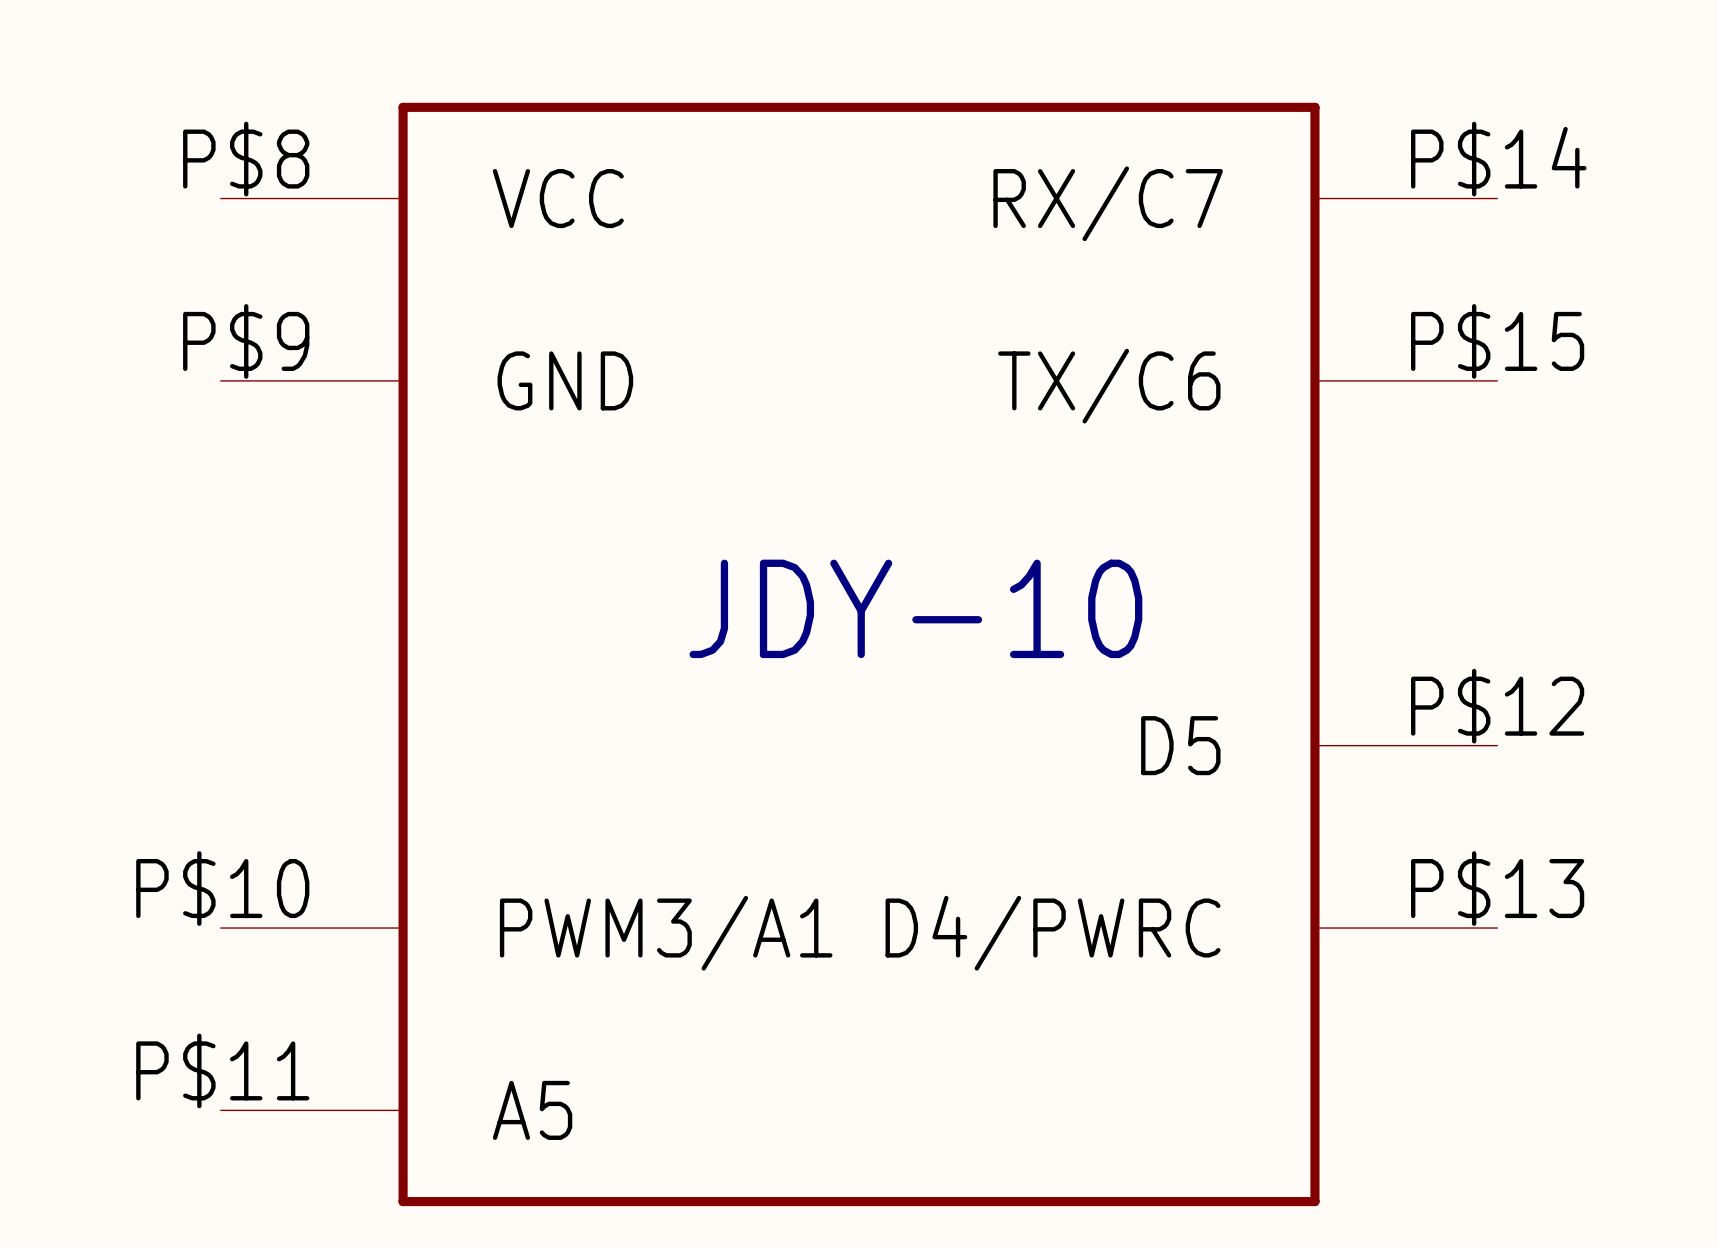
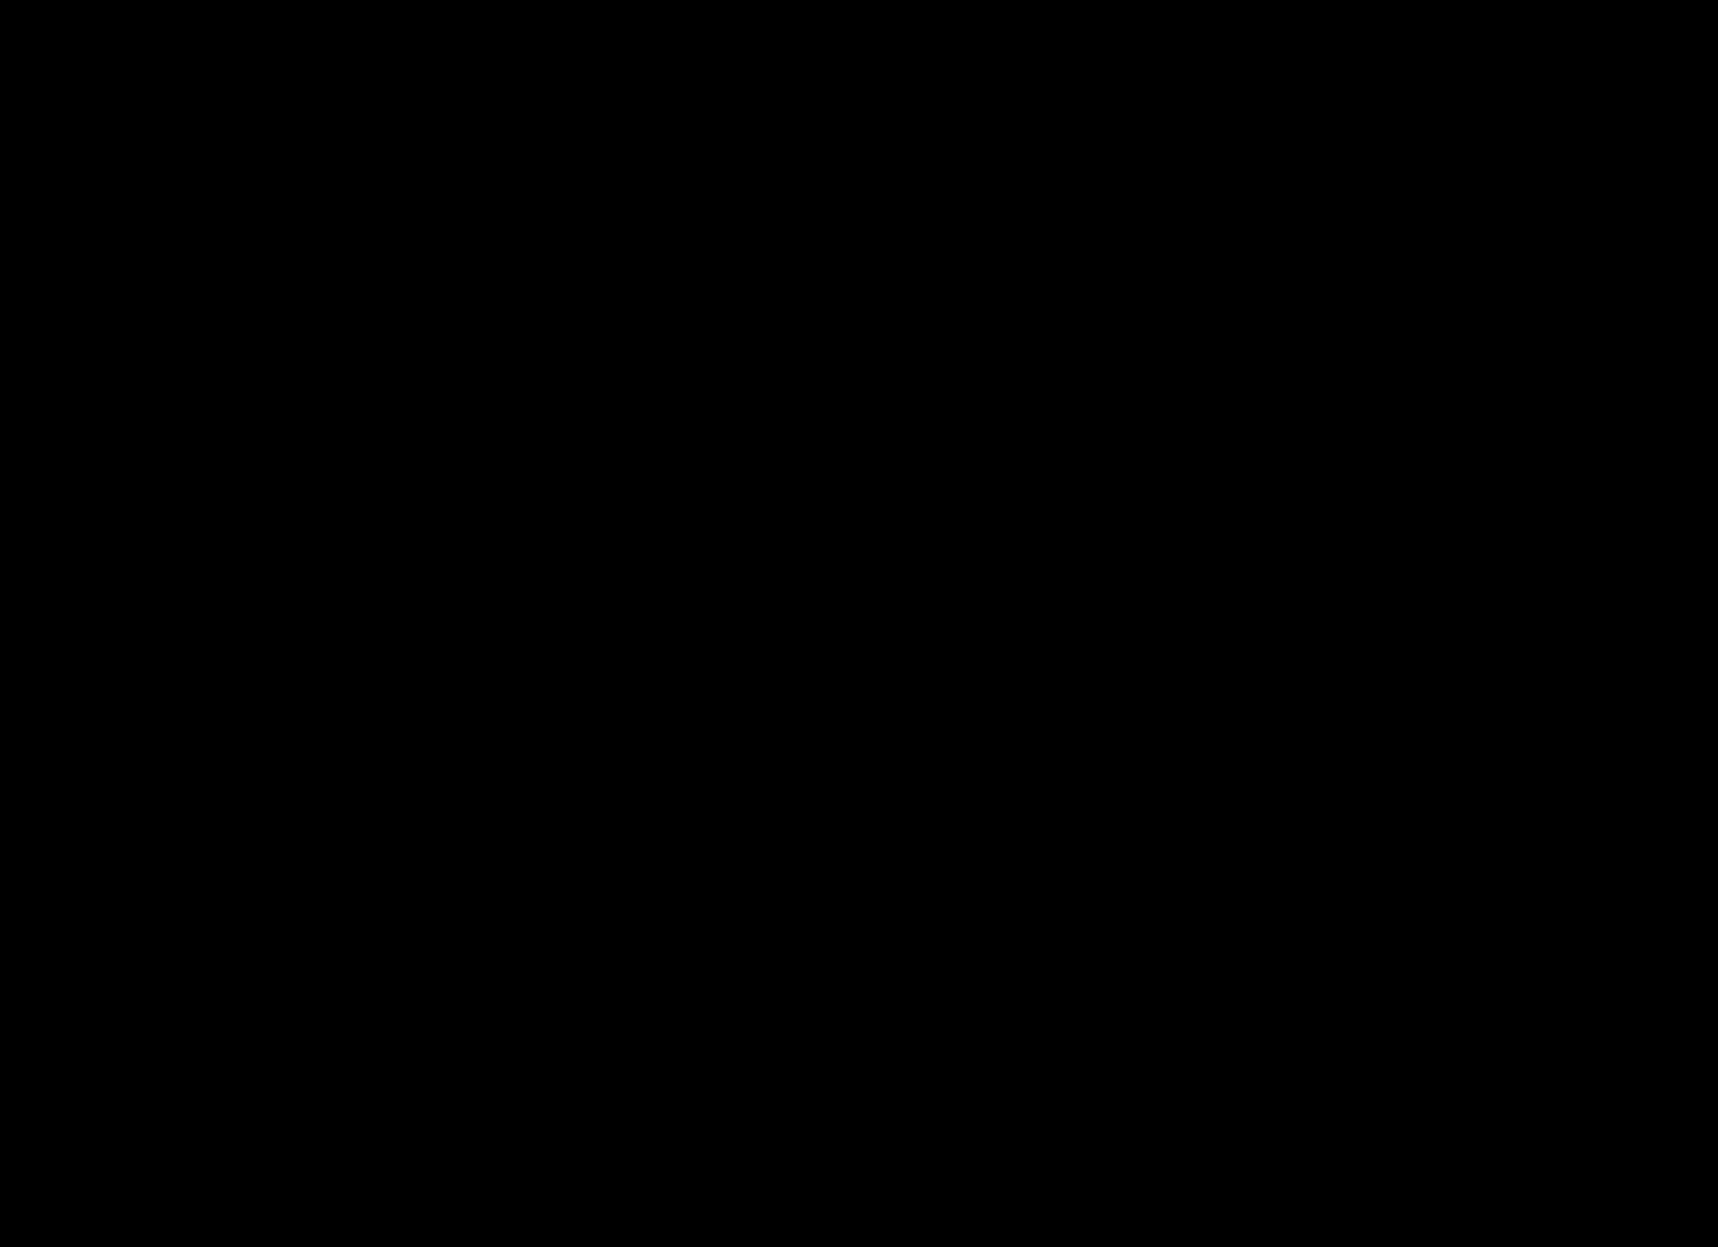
part: (859, 654) -> none

